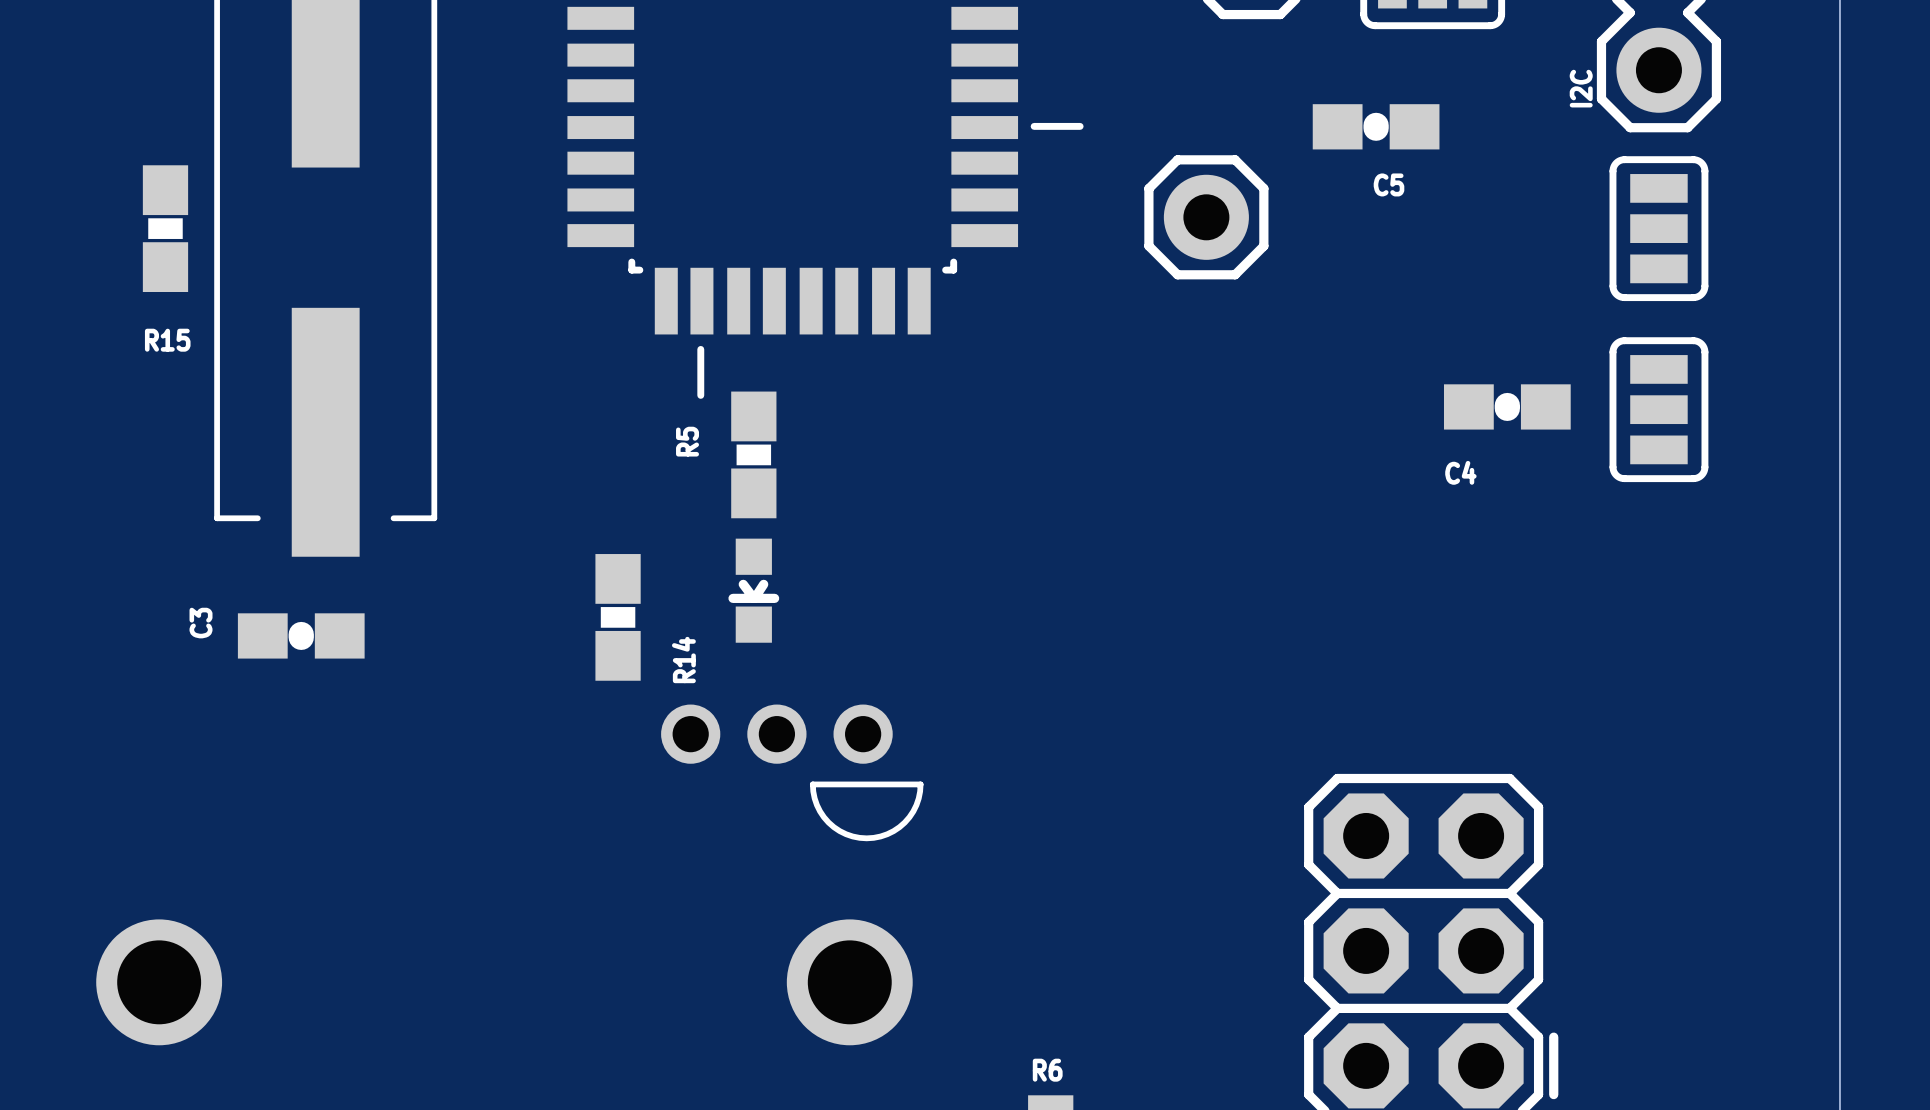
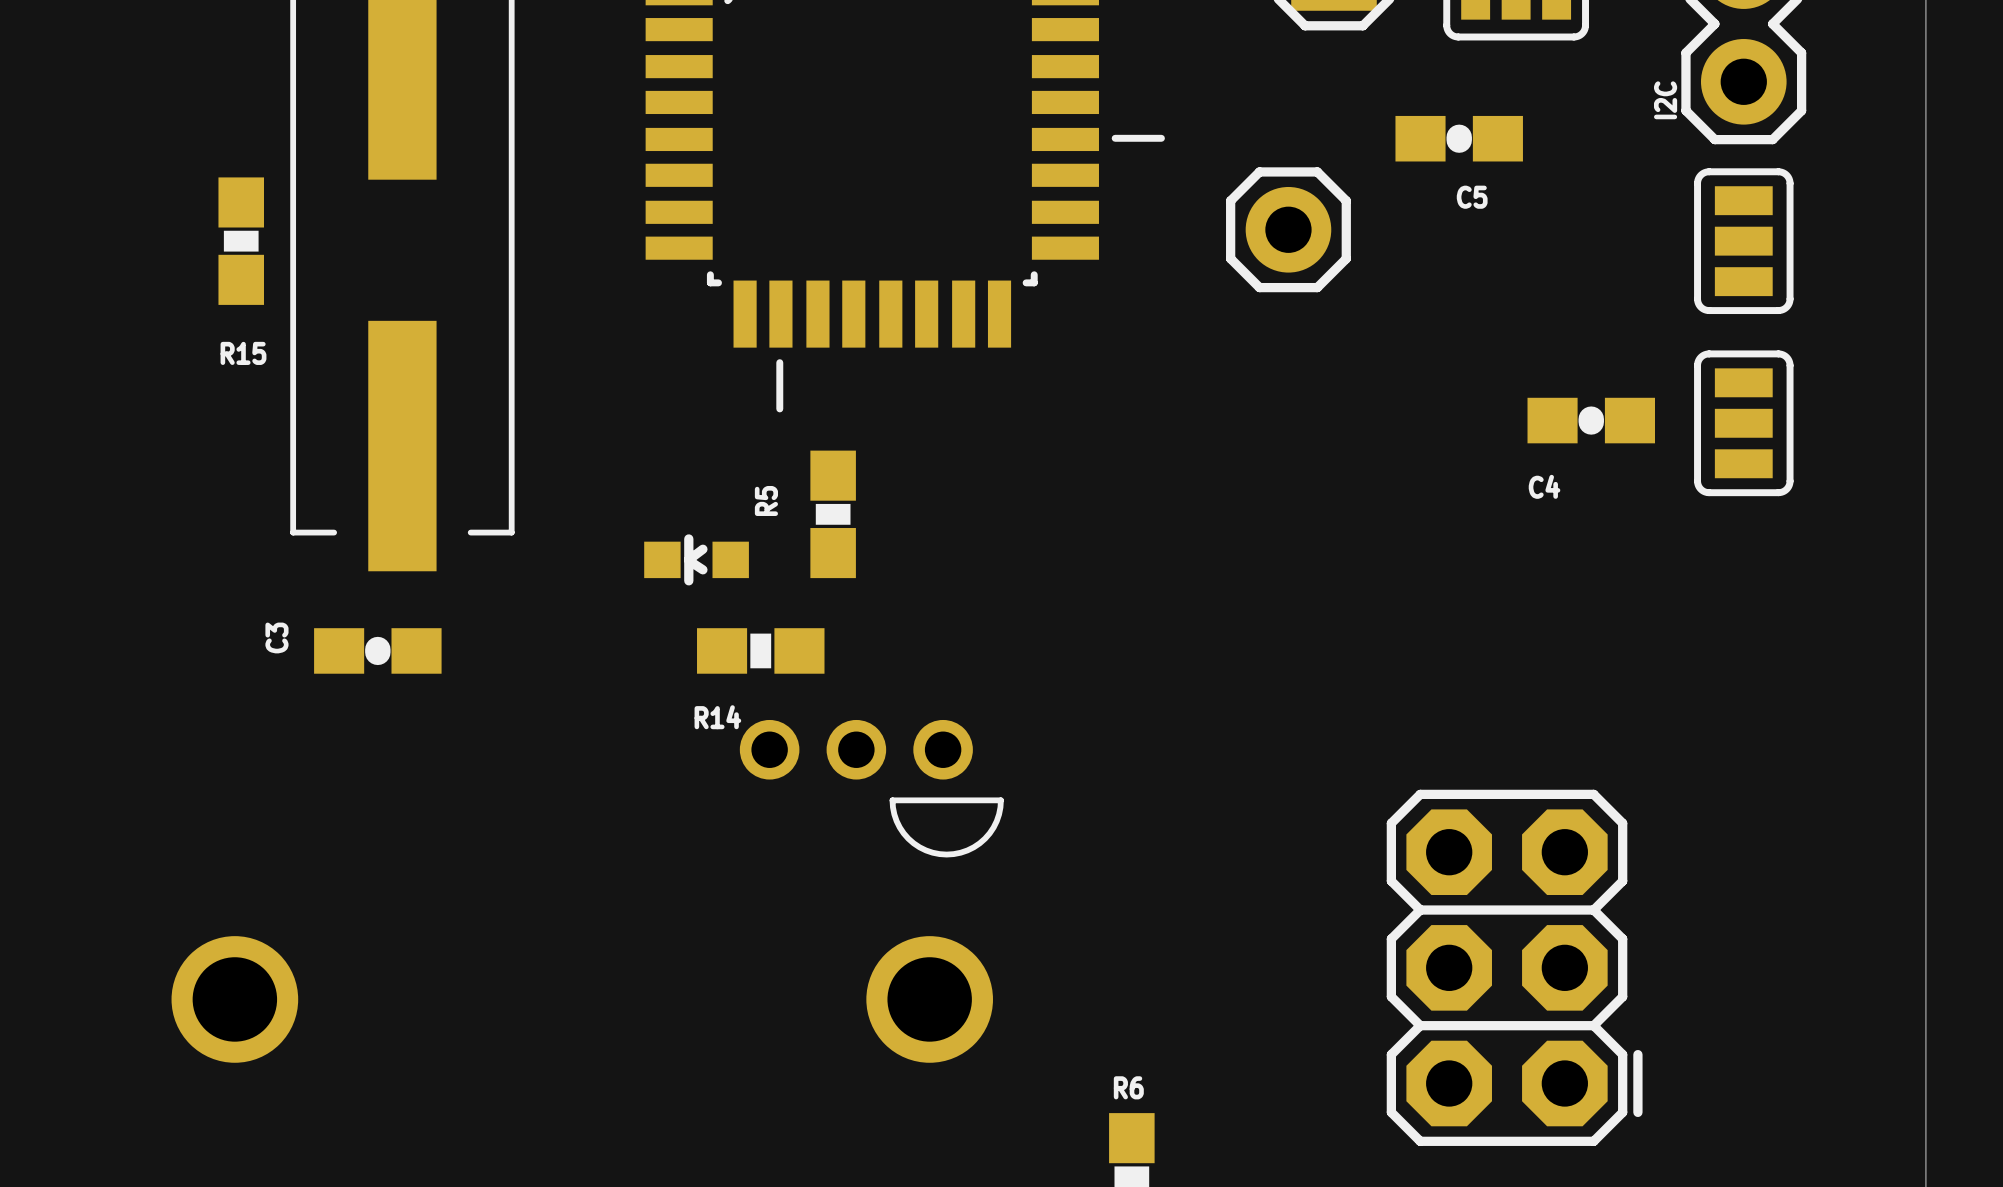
R5 position: (753, 454) -> (833, 514)
part rotation: 0° (753, 590) -> 90° clockwise (696, 559)
part position: (753, 590) -> (696, 559)
R14 rotation: 0° (618, 617) -> 90° clockwise (760, 650)

